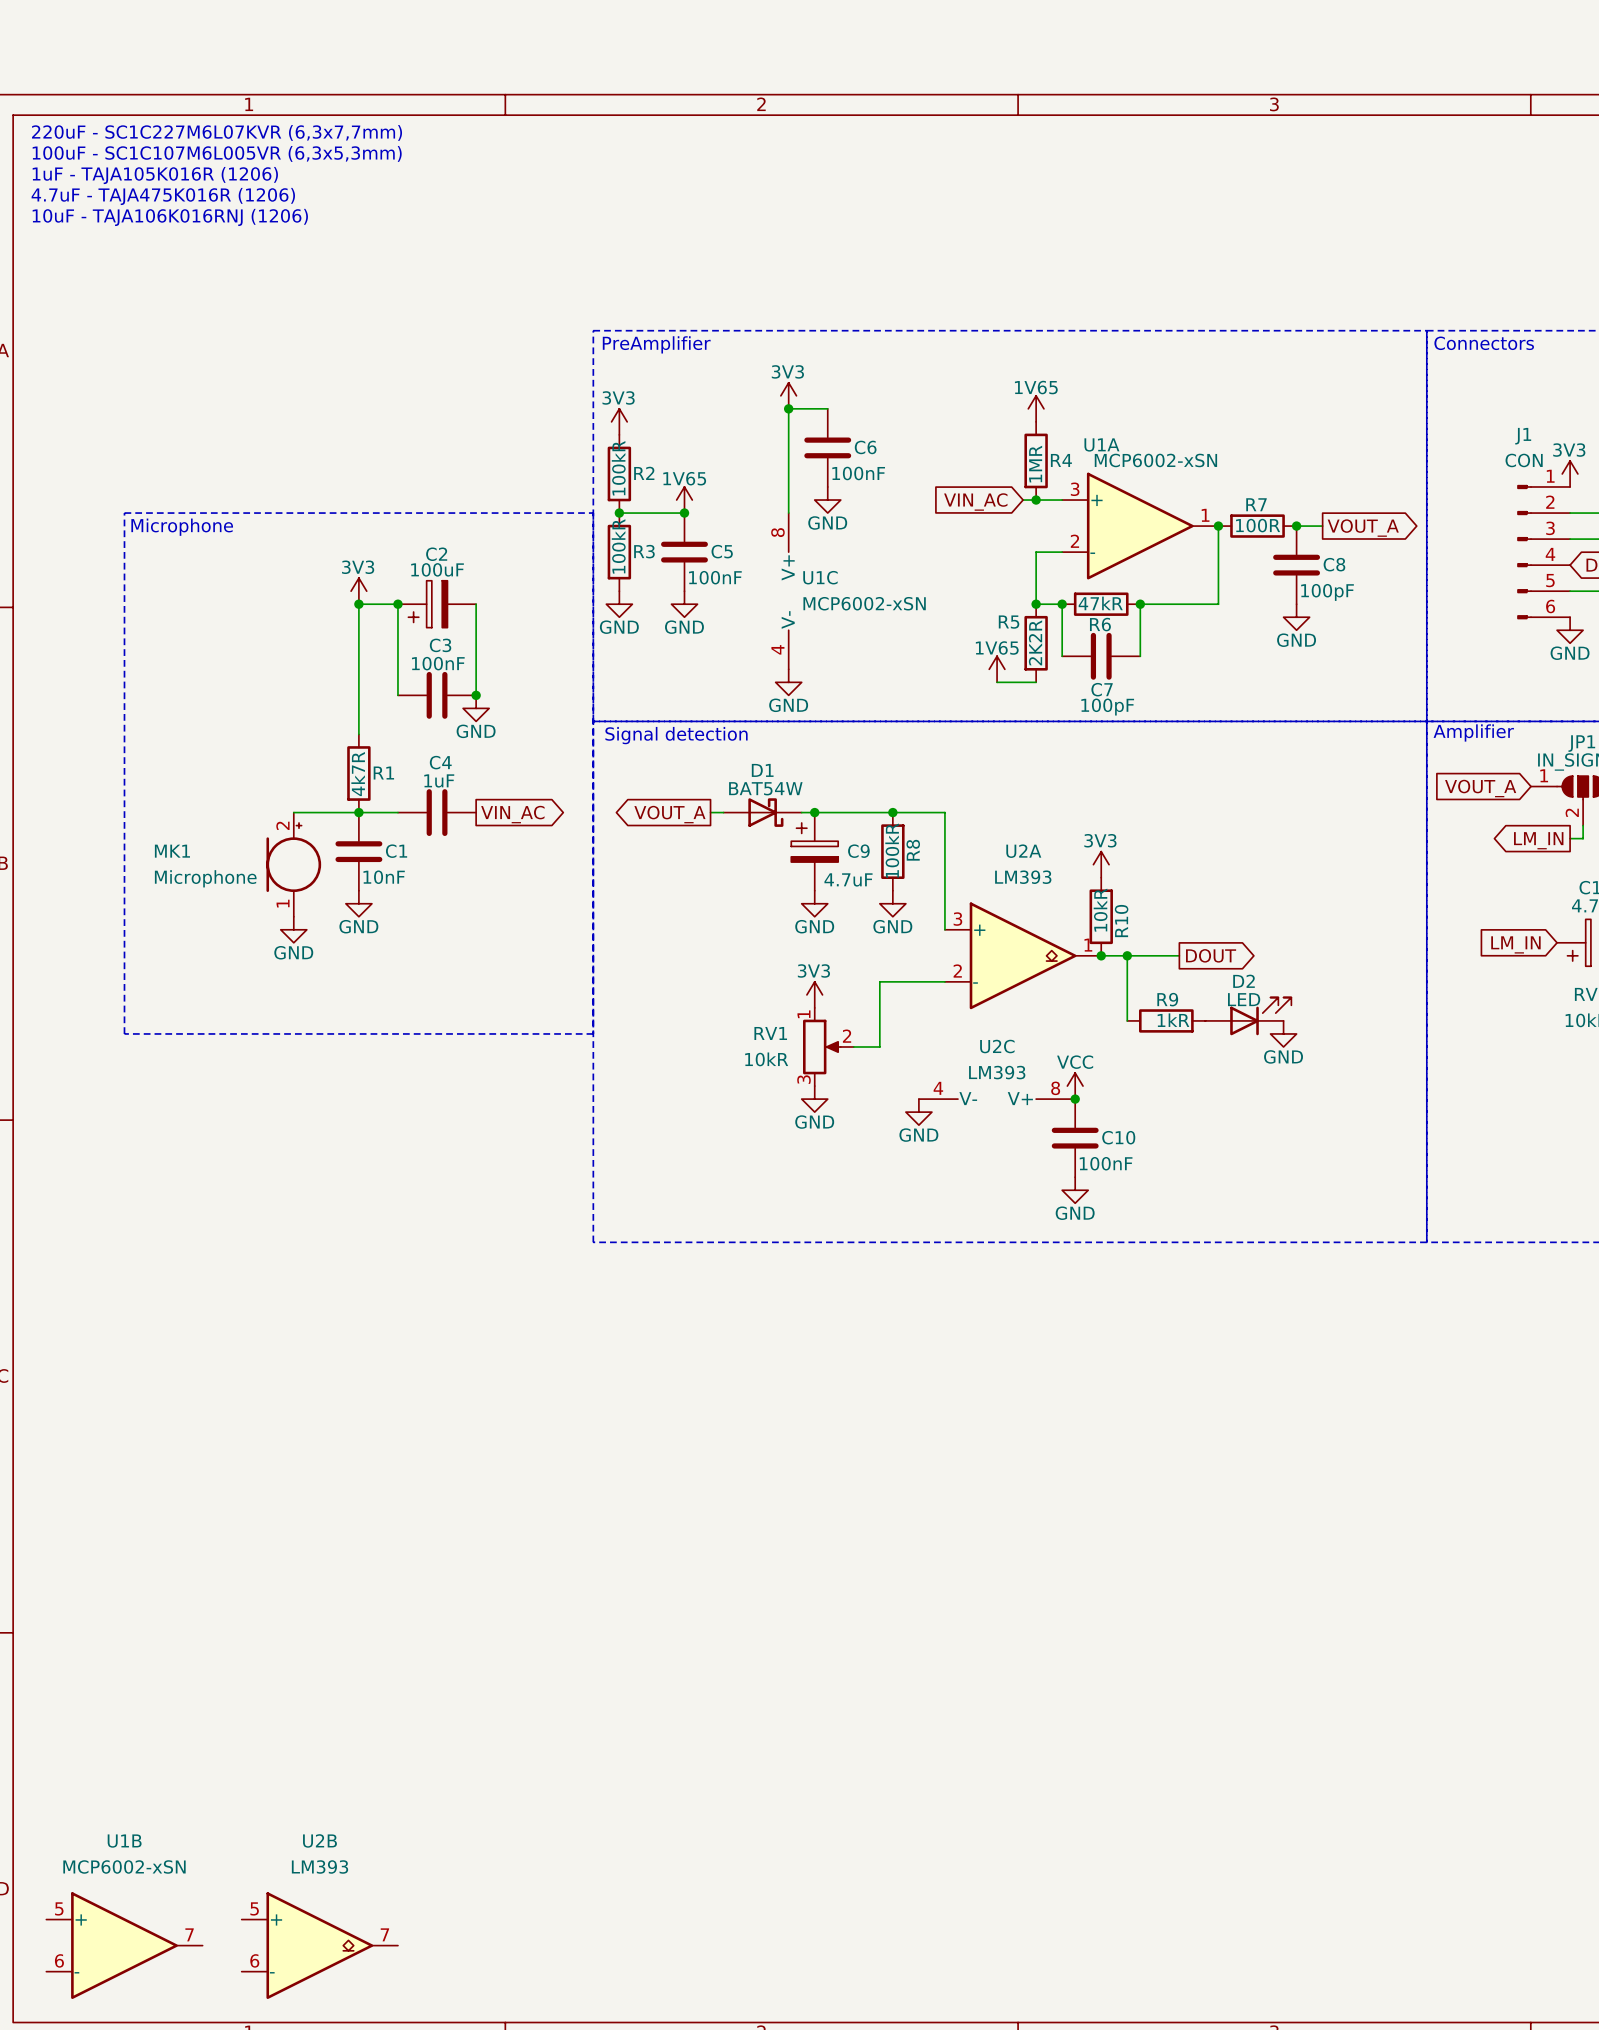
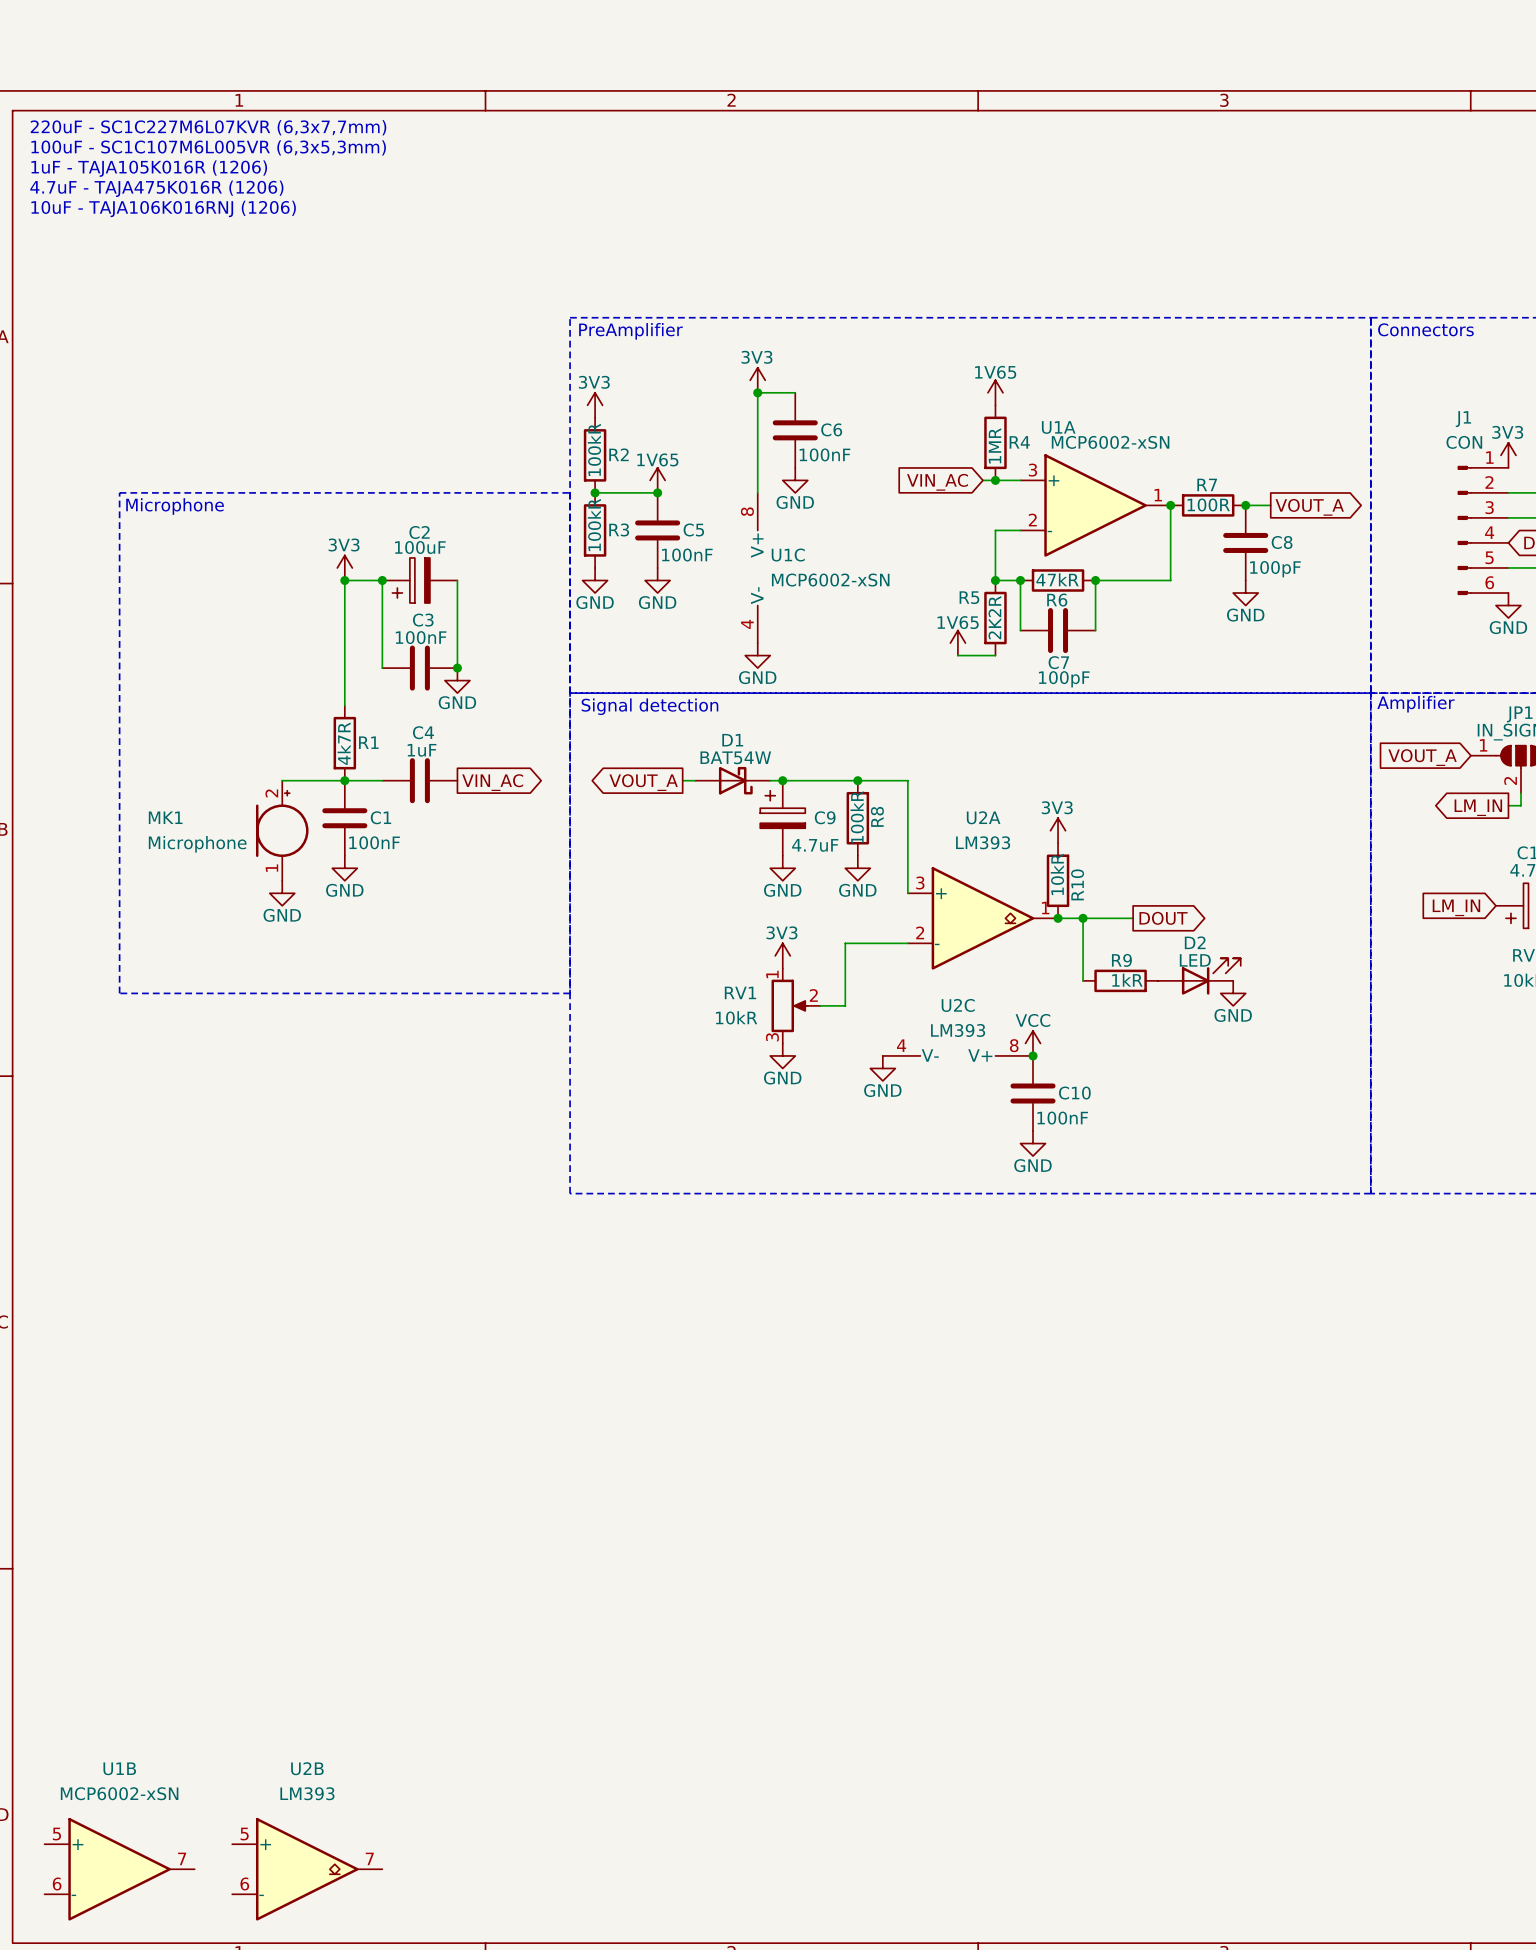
C1 value: 10nF (384, 877) -> 100nF (374, 842)

